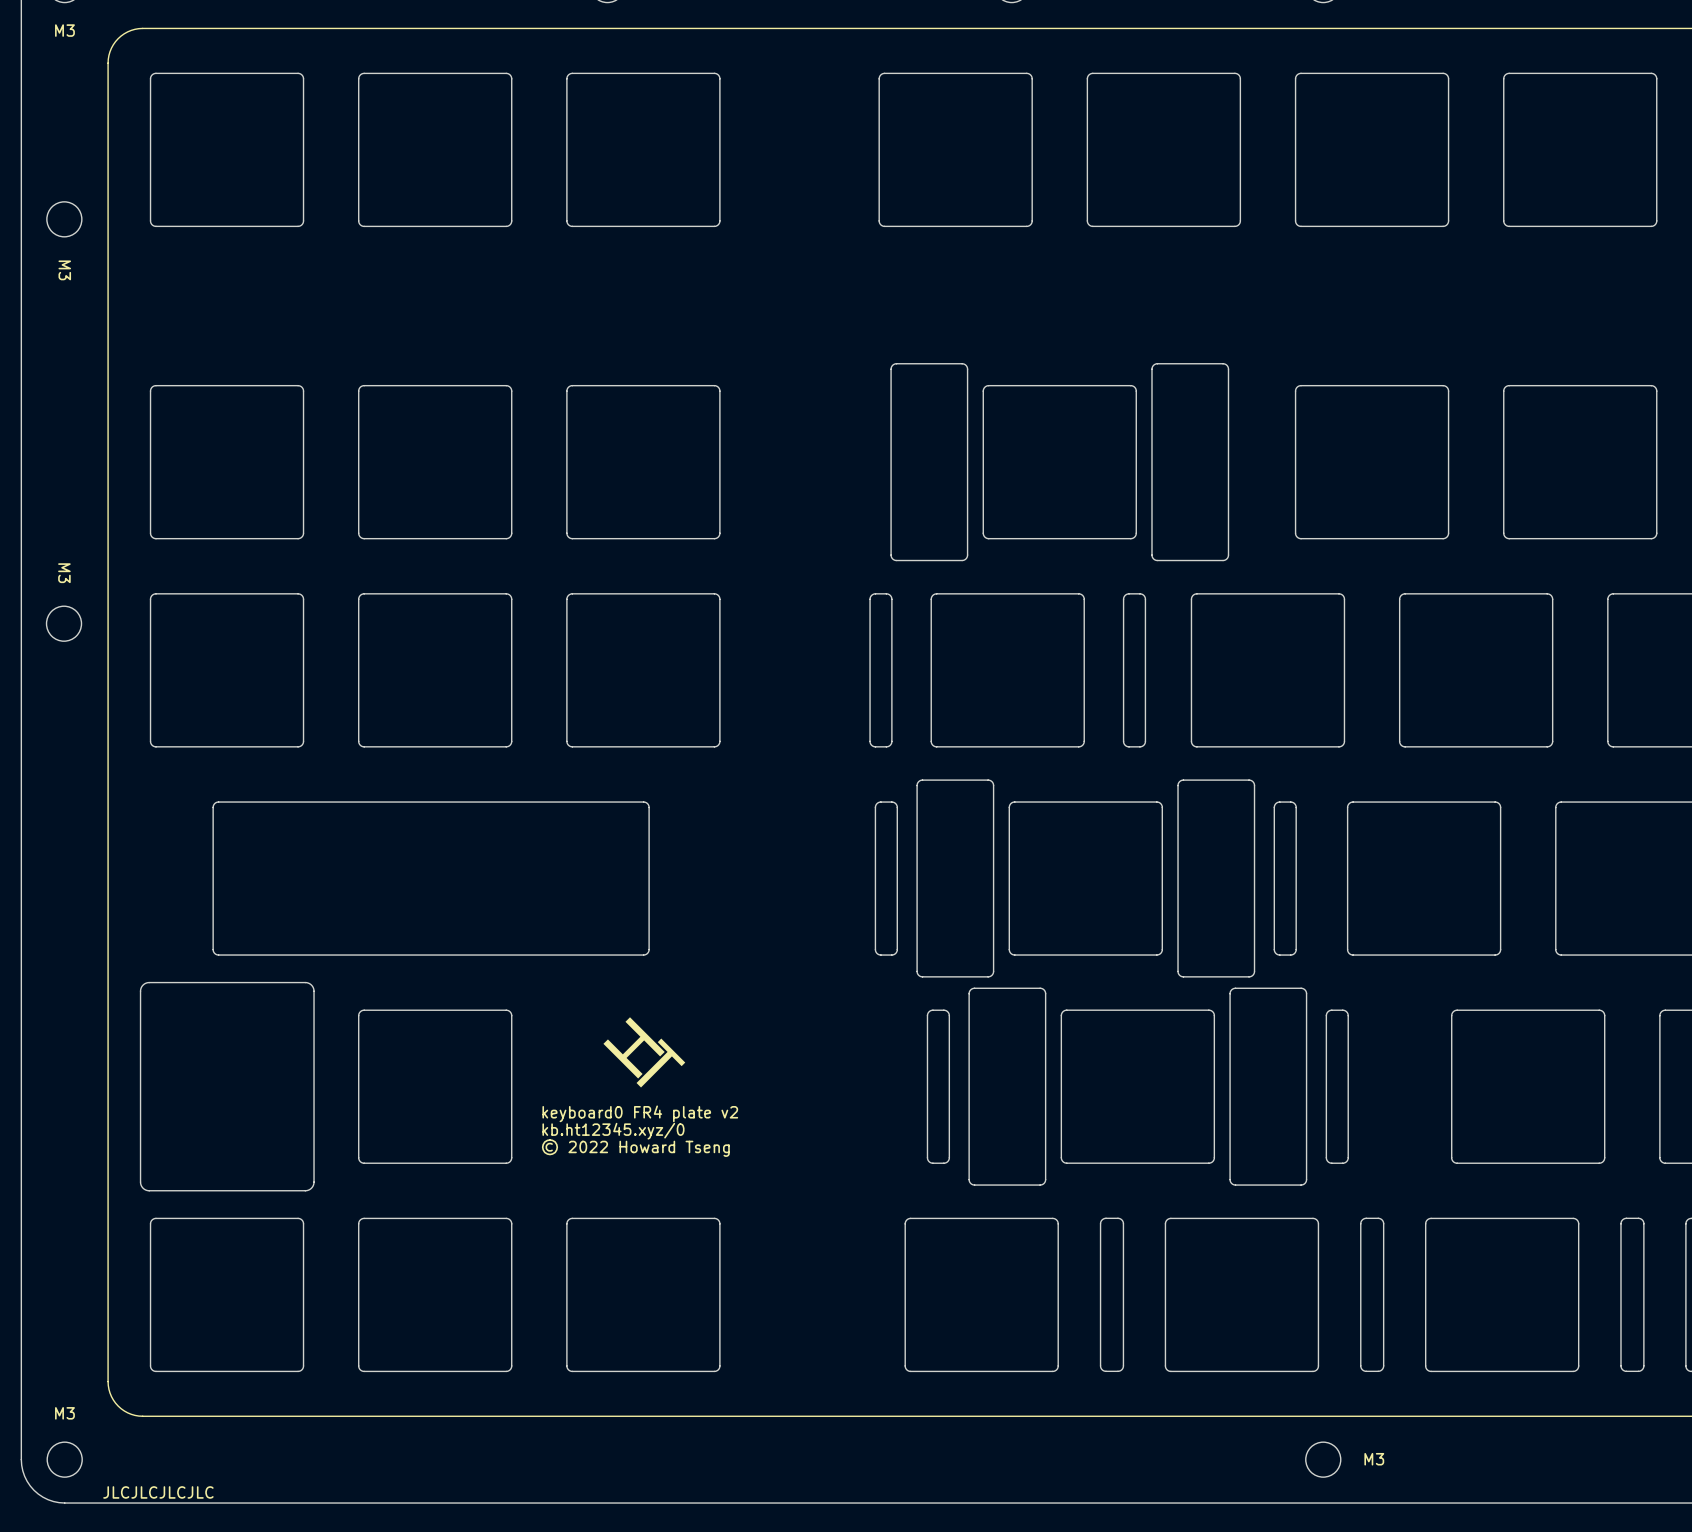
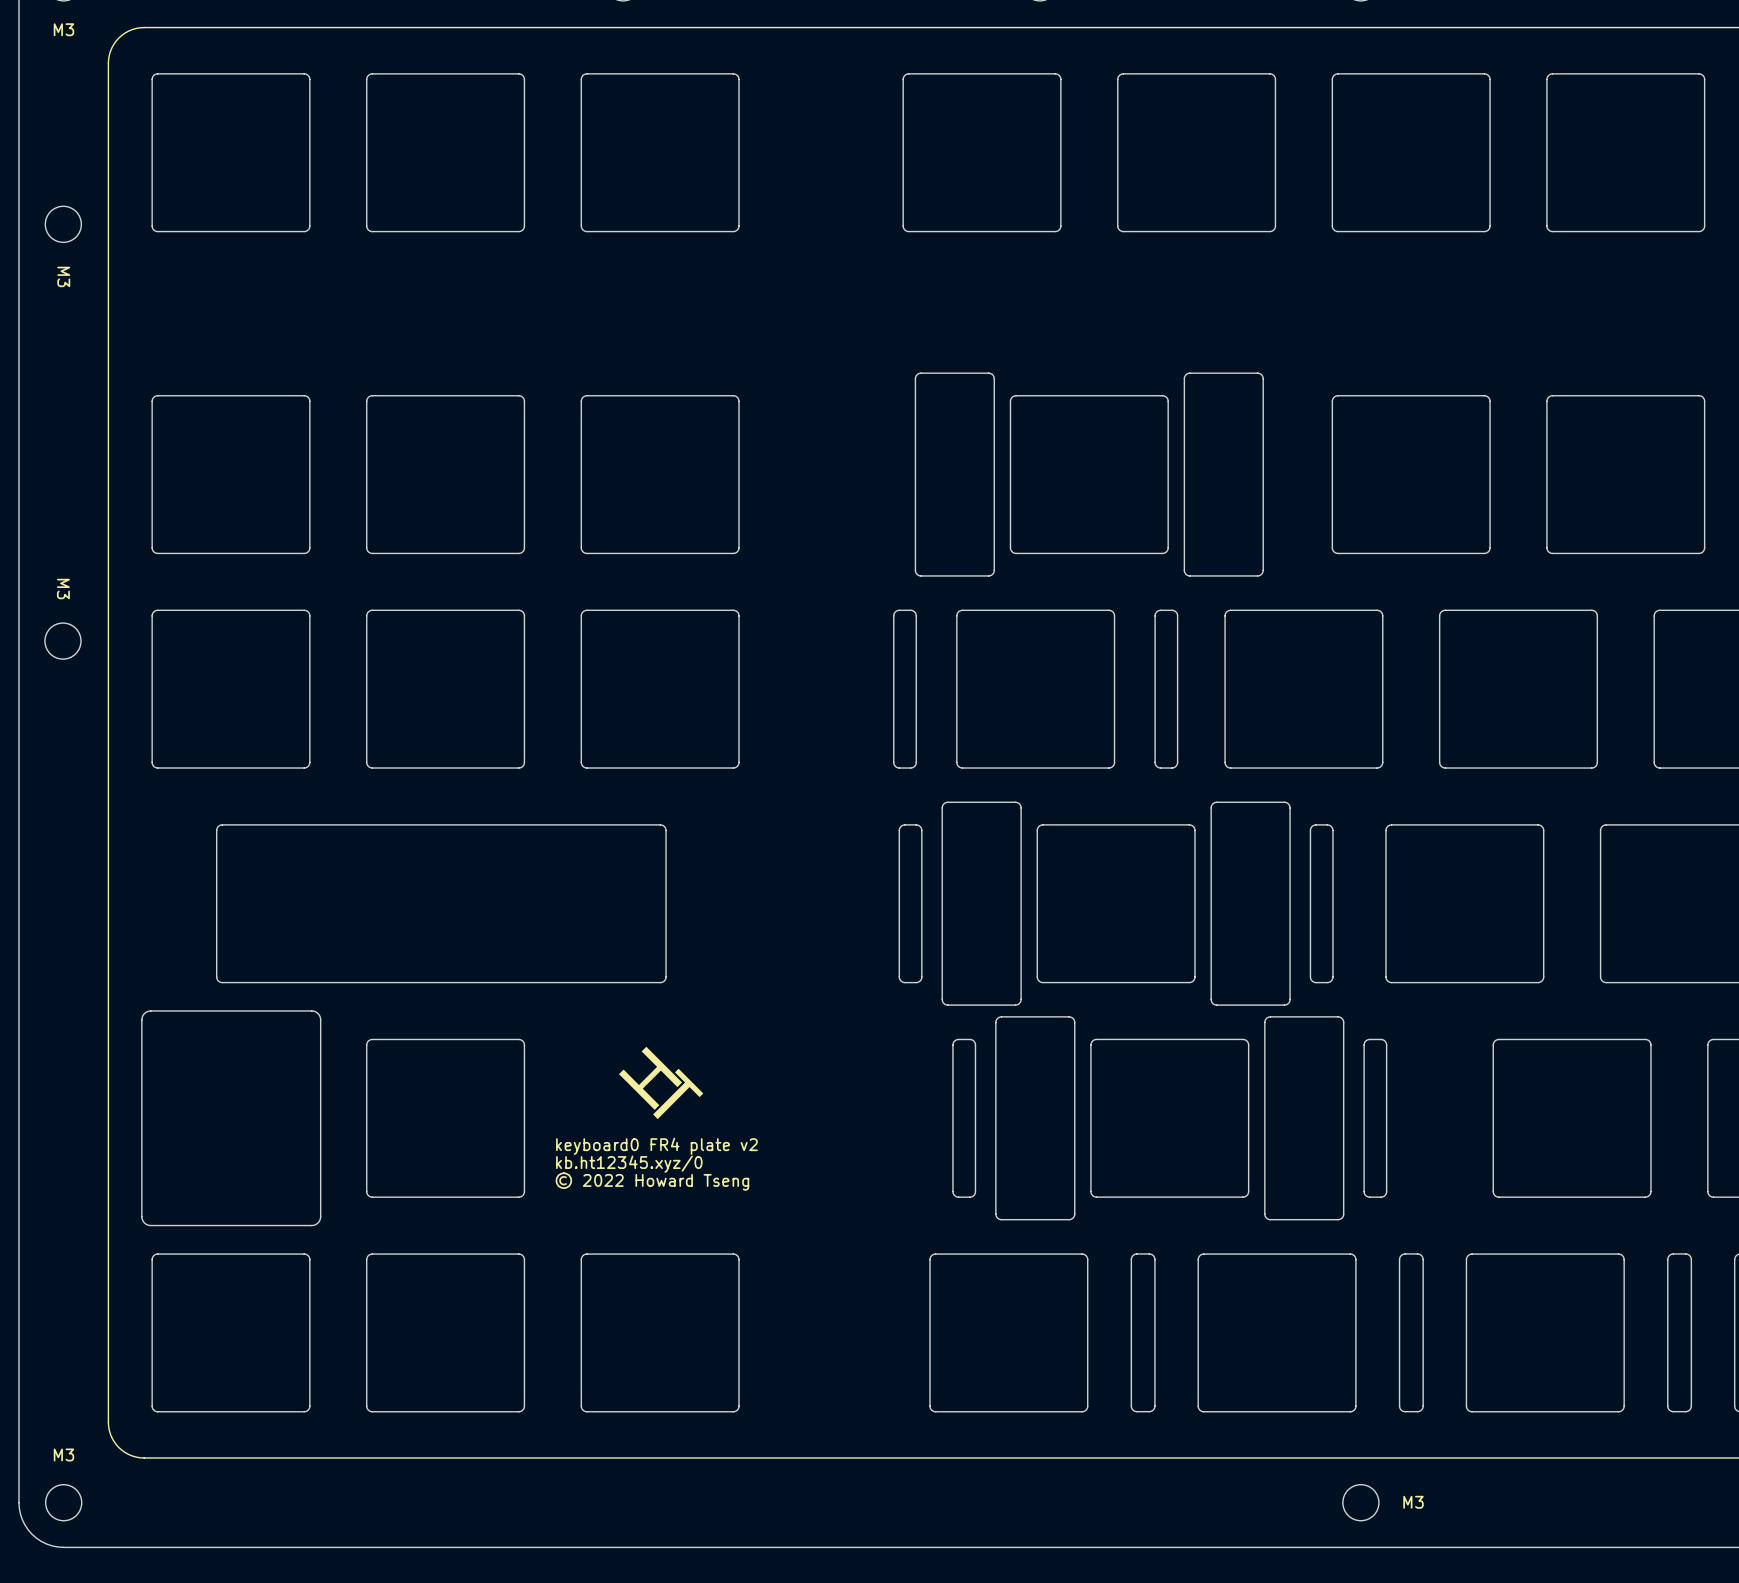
text: JLCJLCJLCJLC (158, 1492) -> none

